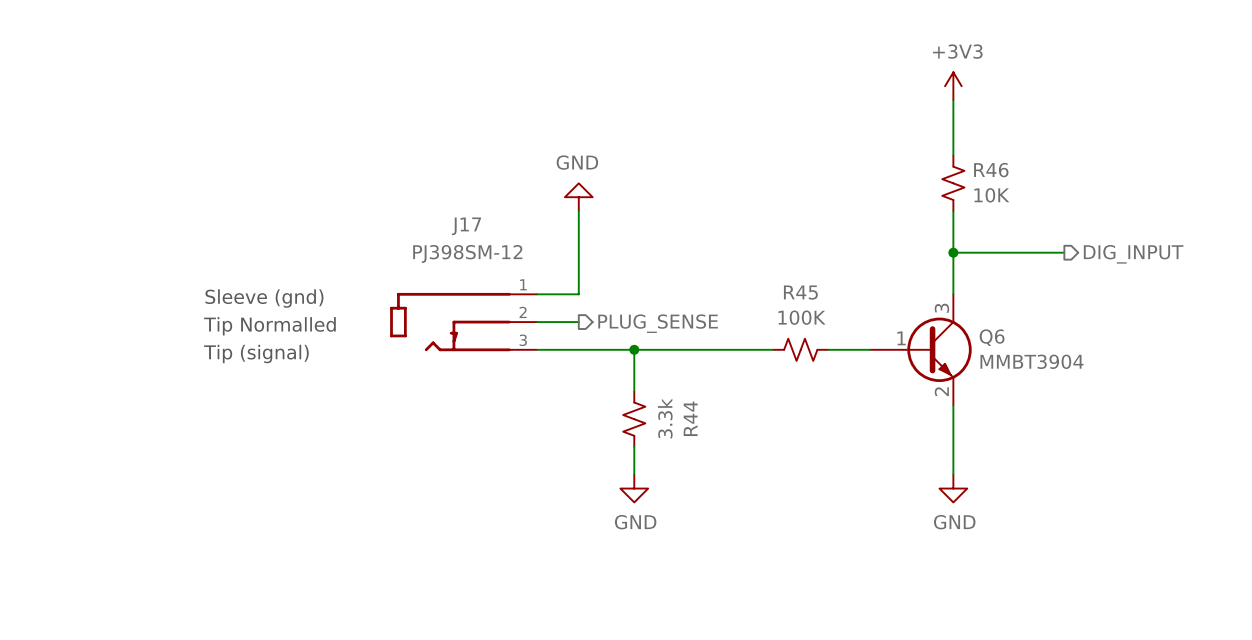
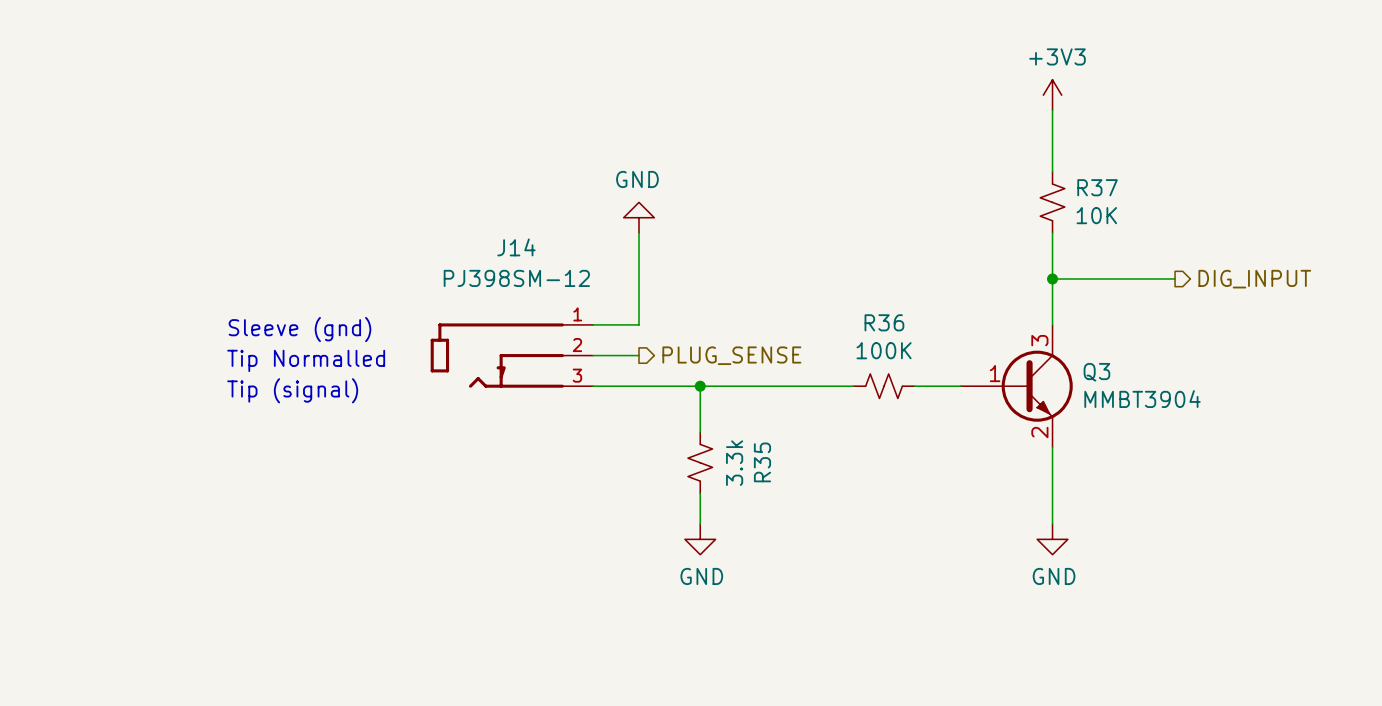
R46 name: R46 (991, 170) -> R37 (1097, 187)
J17 name: J17 (466, 226) -> J14 (516, 247)
R45 name: R45 (800, 292) -> R36 (884, 322)
Q6 name: Q6 (992, 337) -> Q3 (1096, 372)
R44 name: R44 (690, 418) -> R35 (762, 462)

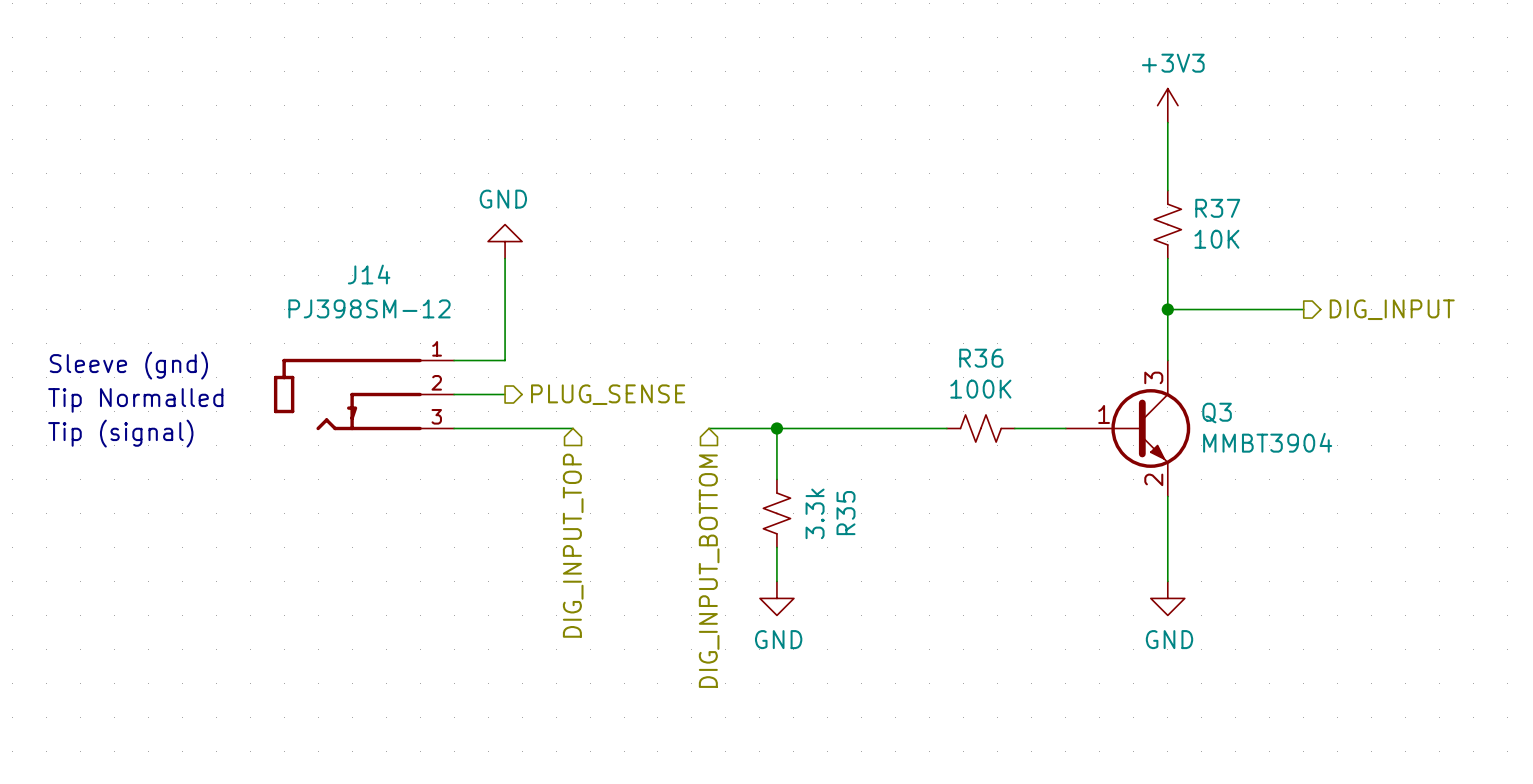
power symbol position: GND (638, 217) -> GND (505, 241)
wire: (638, 233) (638, 324) (593, 324) -> (505, 258) (505, 360) (454, 360)
text position: Sleeve (gnd) (299, 329) -> Sleeve (gnd) (128, 365)
J14 position: (511, 355) -> (364, 394)
wire: (593, 355) (638, 355) -> (454, 394) (505, 394)
hierarchical label position: PLUG_SENSE (731, 355) -> PLUG_SENSE (608, 394)
text position: Tip Normalled (306, 360) -> Tip Normalled (135, 400)
wire: none -> (454, 428) (573, 428)
wire: (593, 386) (638, 386) -> none
text position: Tip (signal) (292, 390) -> Tip (signal) (120, 433)
hierarchical label: none -> DIG_INPUT_TOP (573, 545)
hierarchical label: none -> DIG_INPUT_BOTTOM (709, 571)

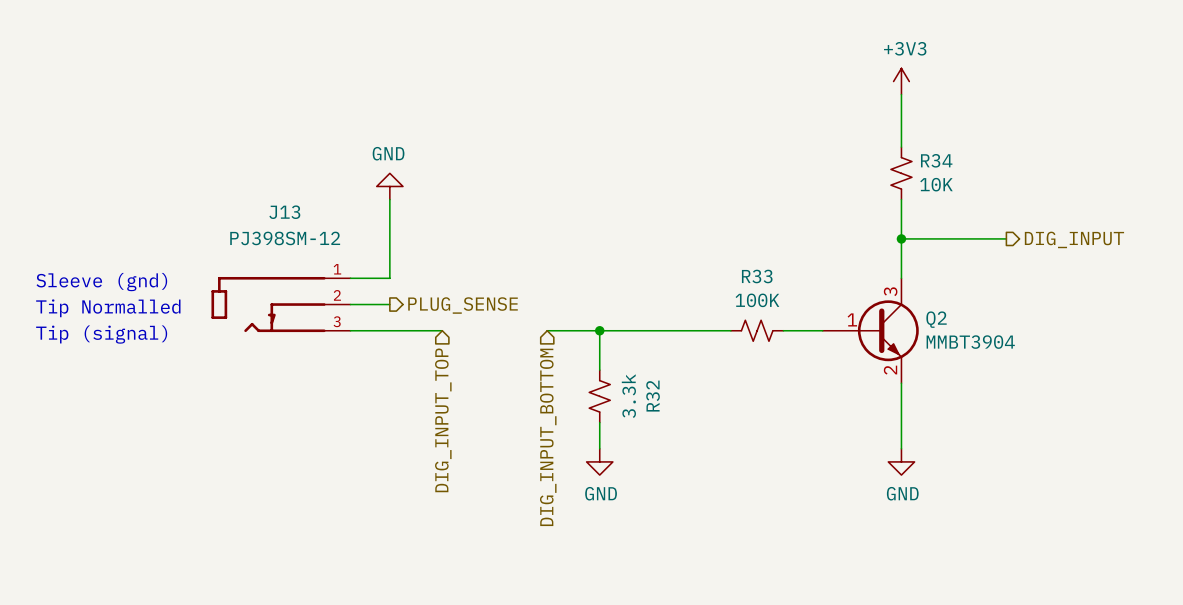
R37 name: R37 (1217, 208) -> R34 (936, 160)
J14 name: J14 (369, 274) -> J13 (284, 212)
R36 name: R36 (981, 358) -> R33 (757, 276)
Q3 name: Q3 (1217, 413) -> Q2 (936, 319)
R35 name: R35 (845, 513) -> R32 (653, 396)

